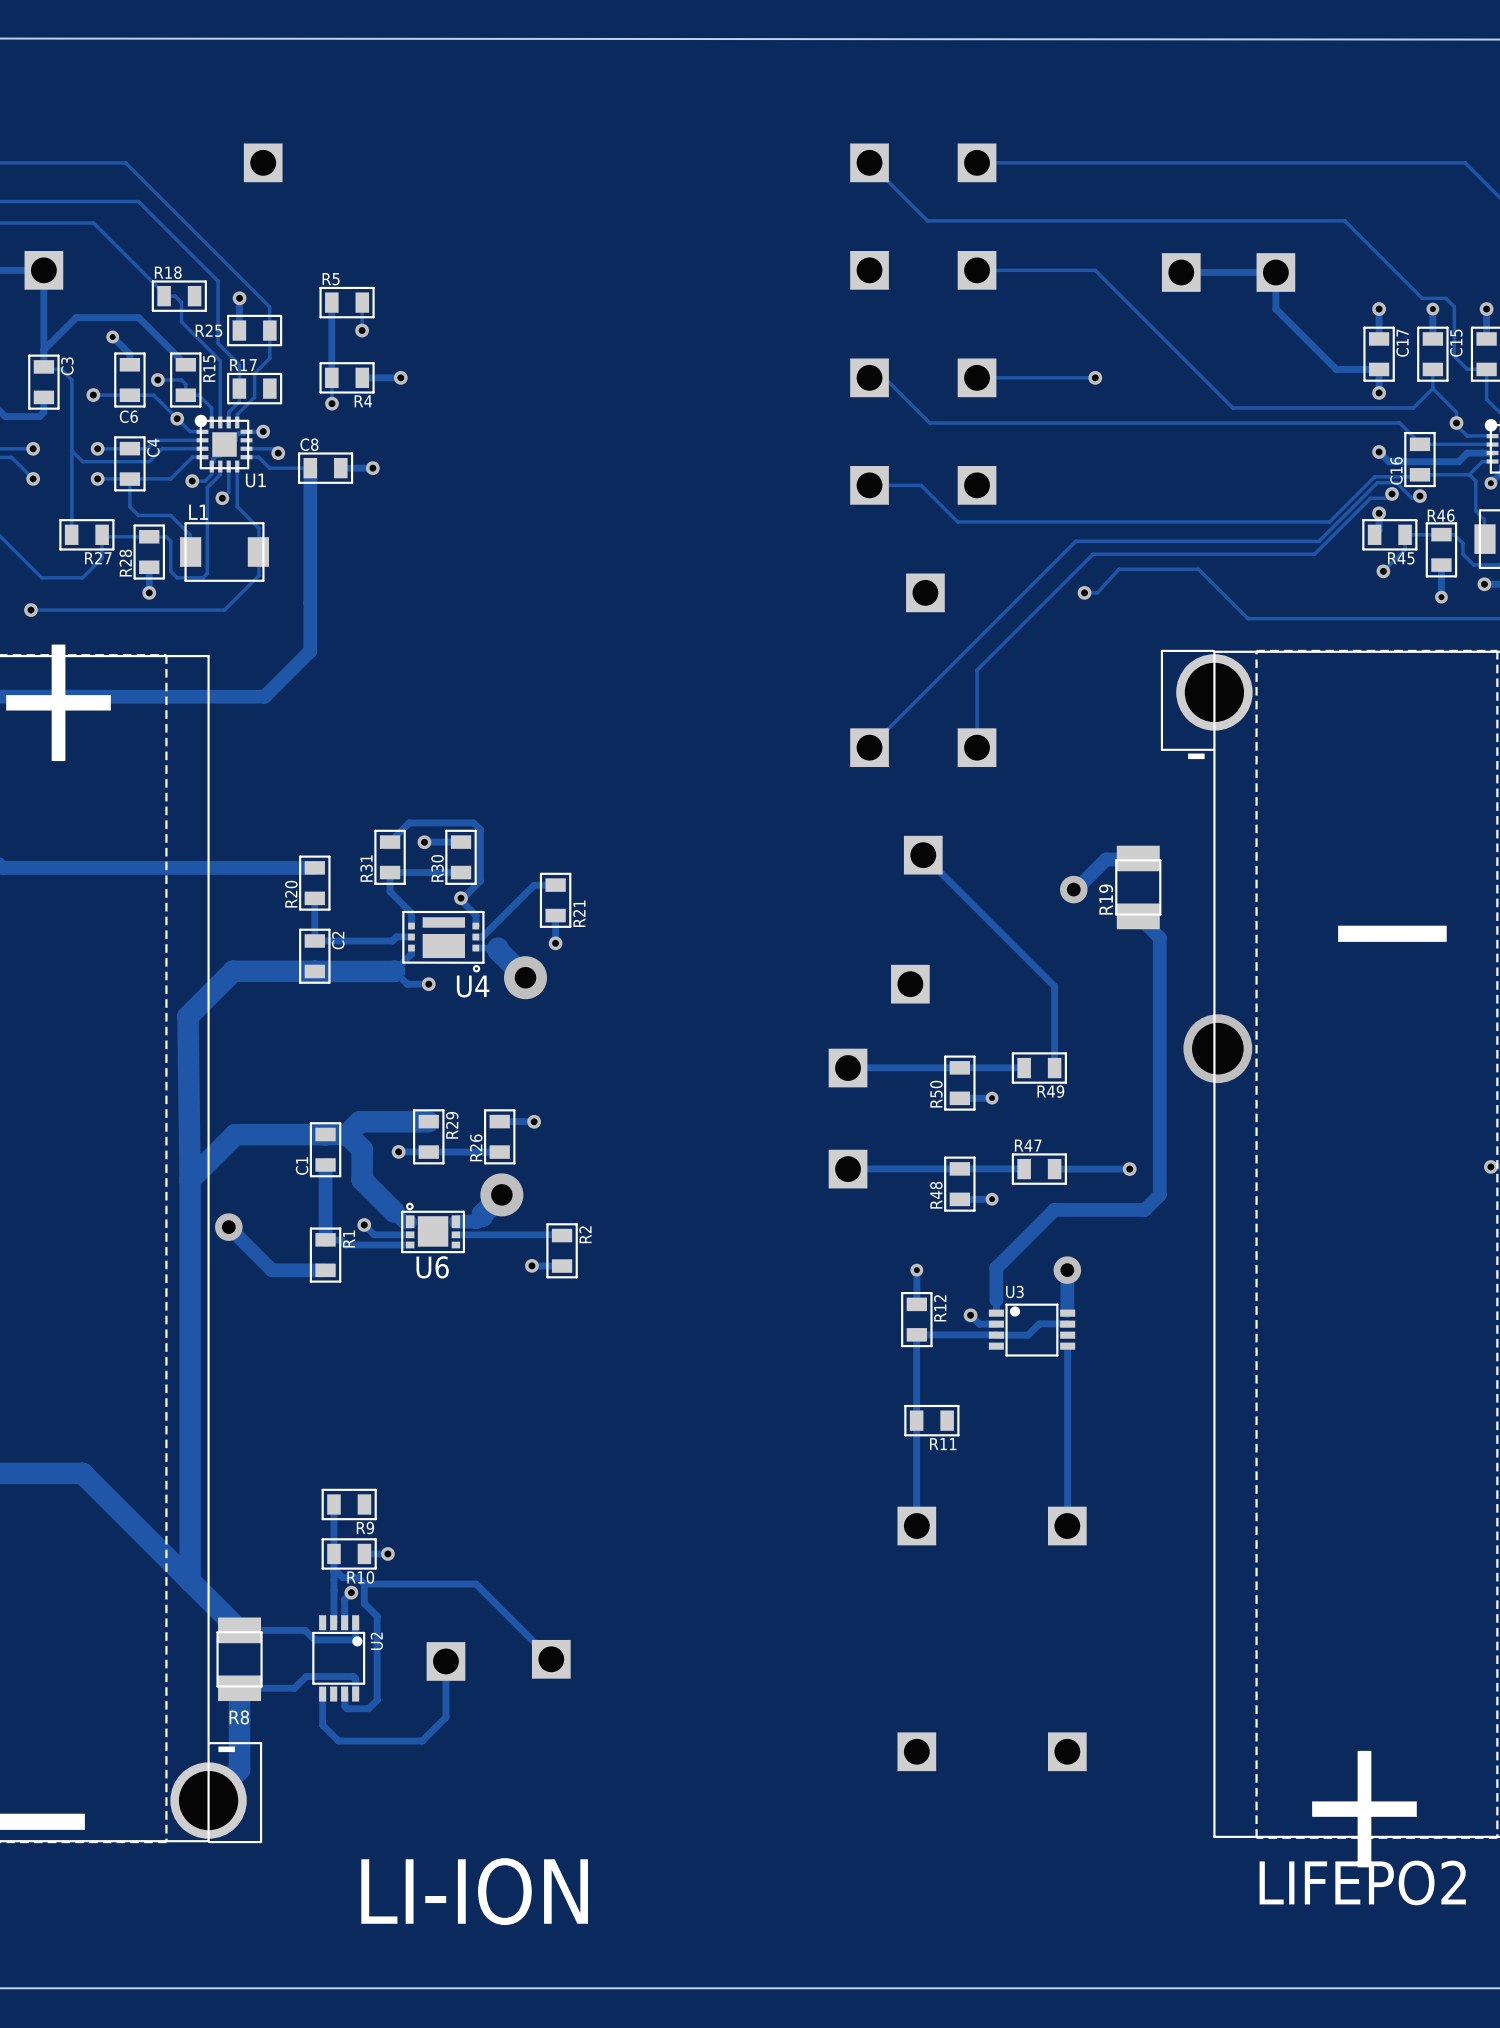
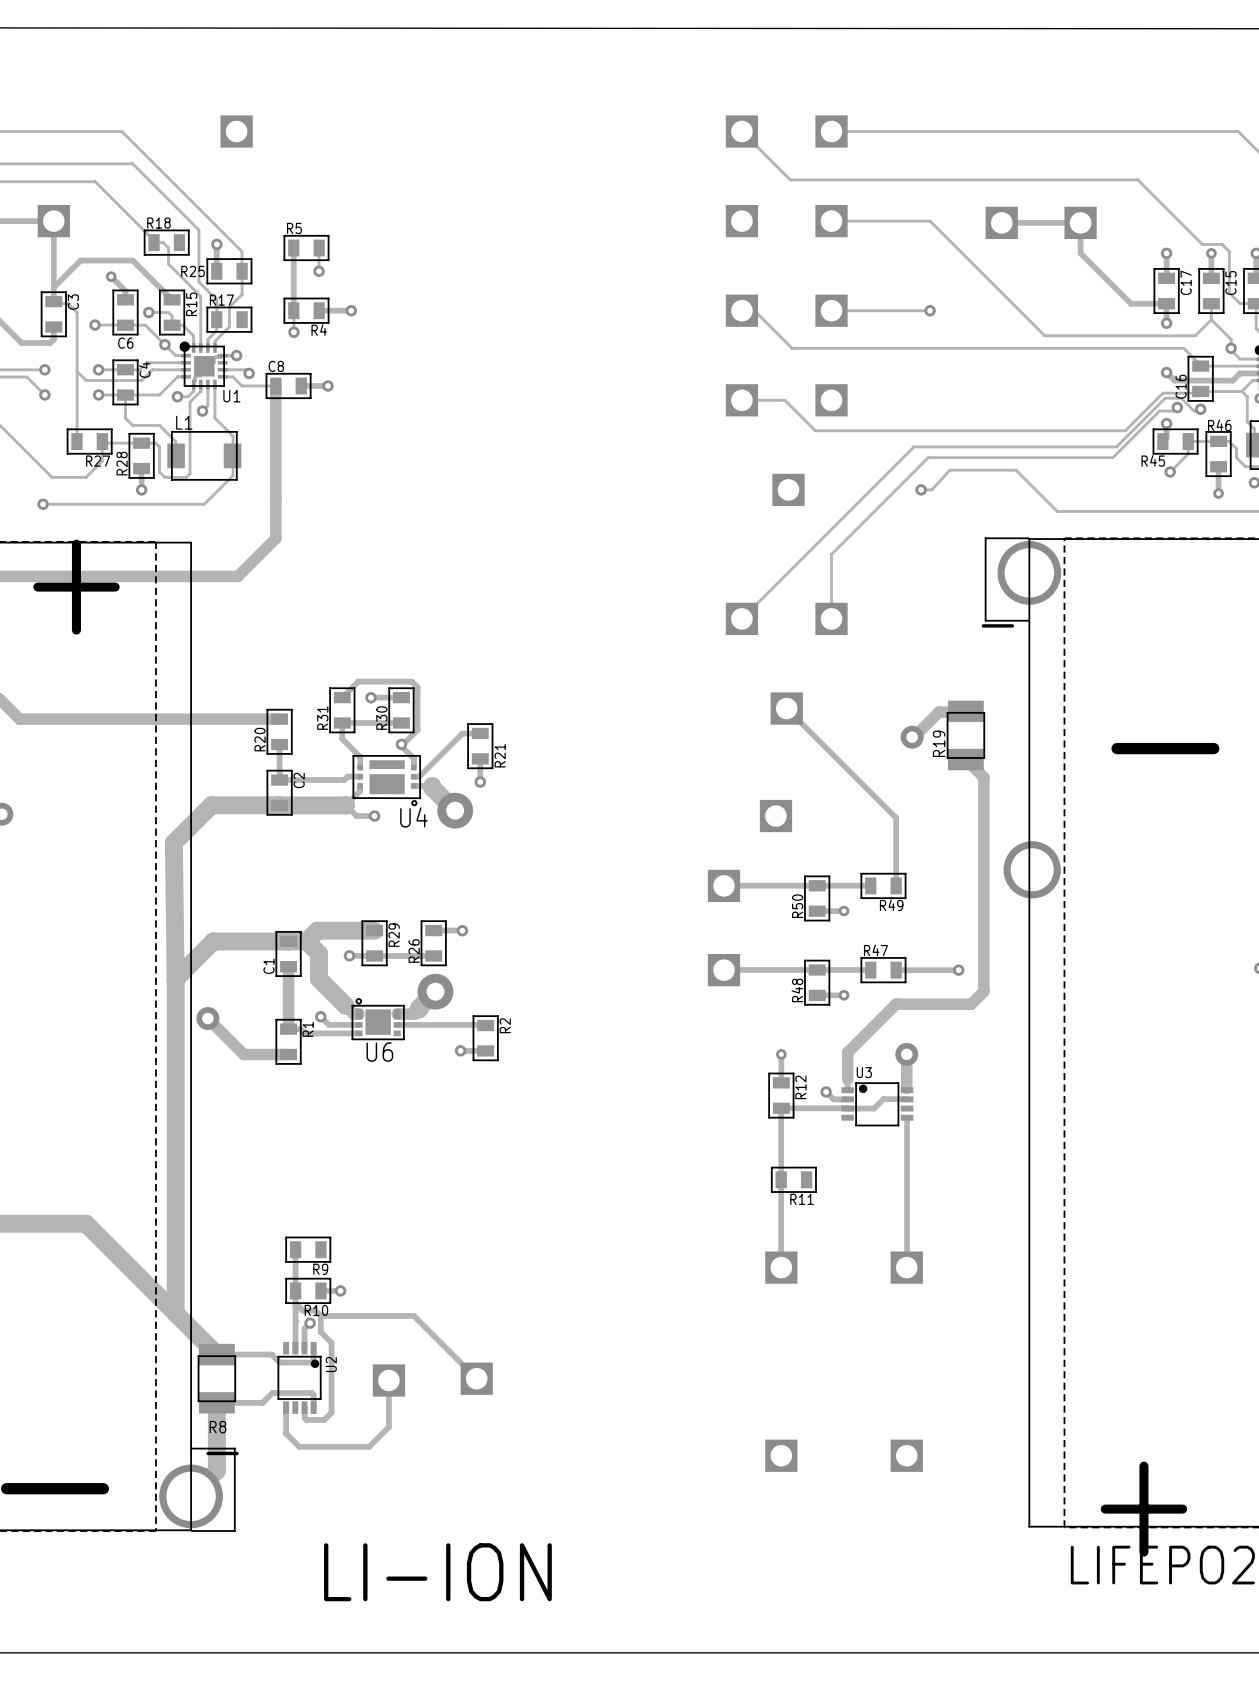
R45 name position: R45 (1401, 558) -> R45 (1153, 460)

